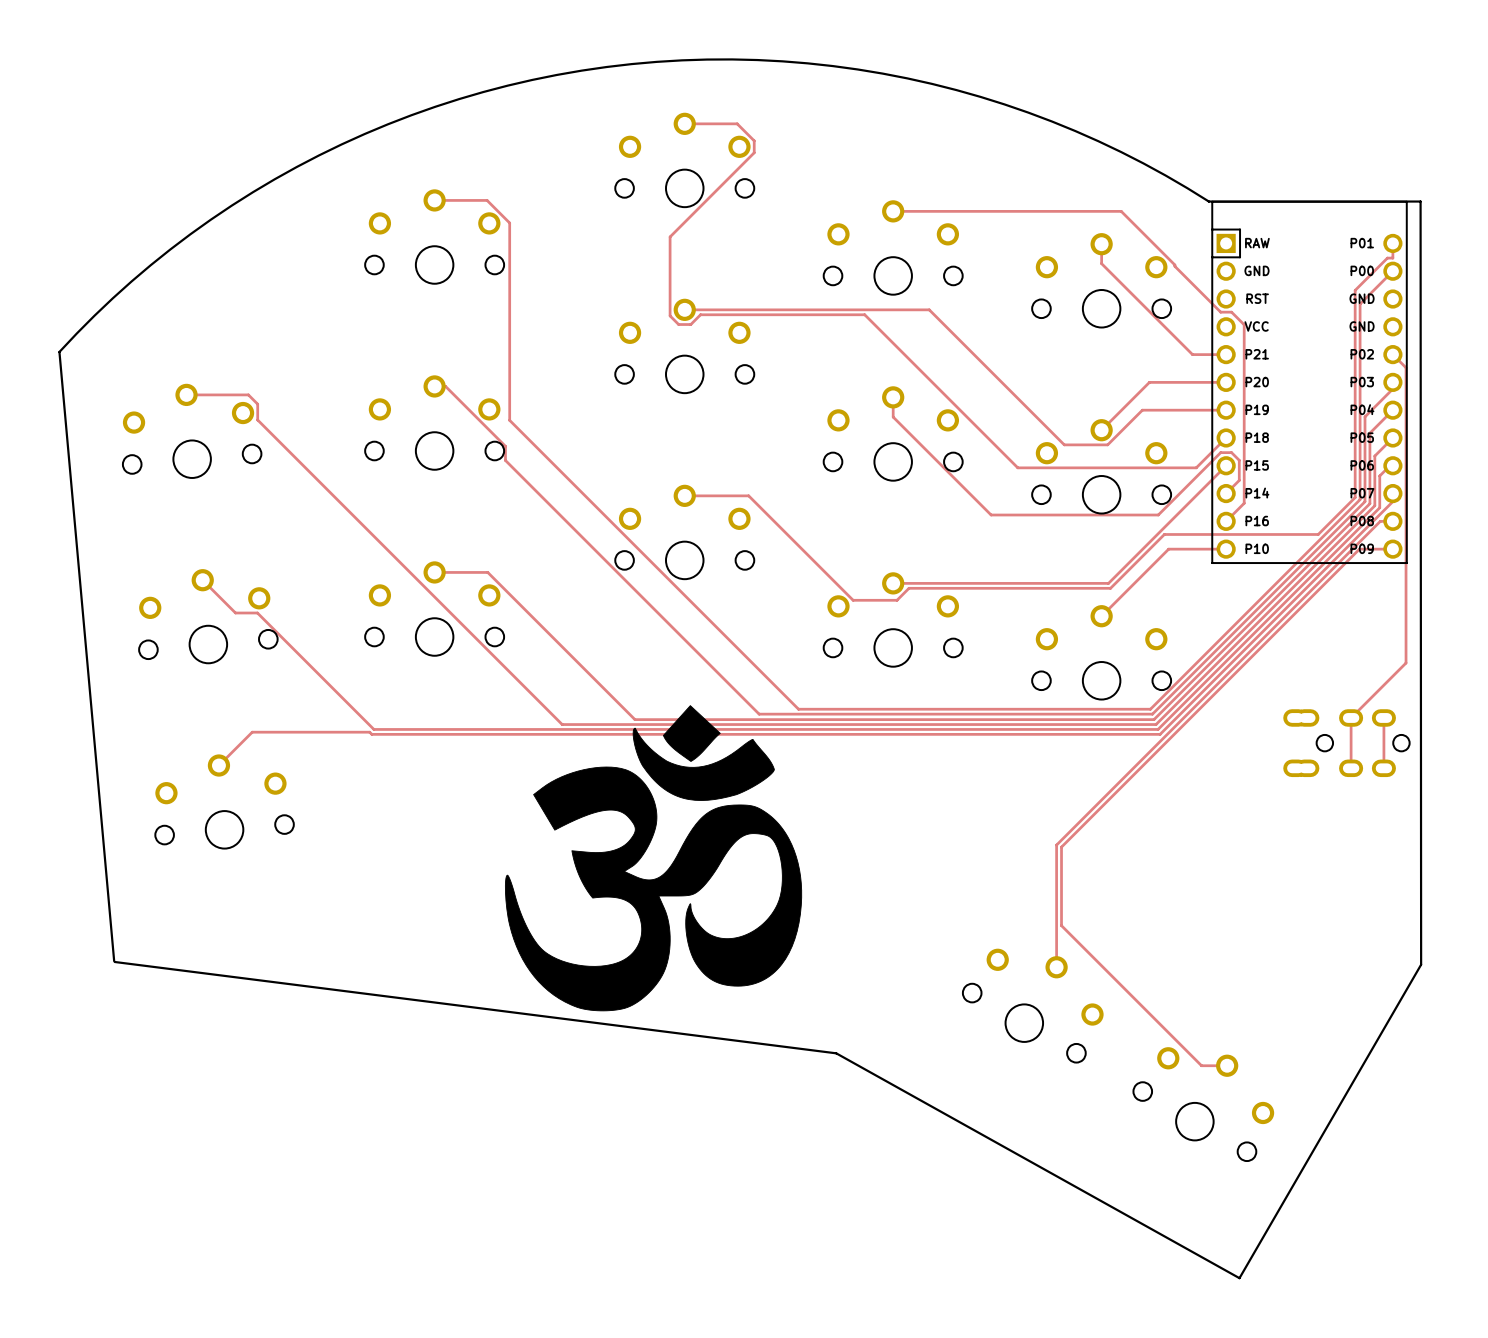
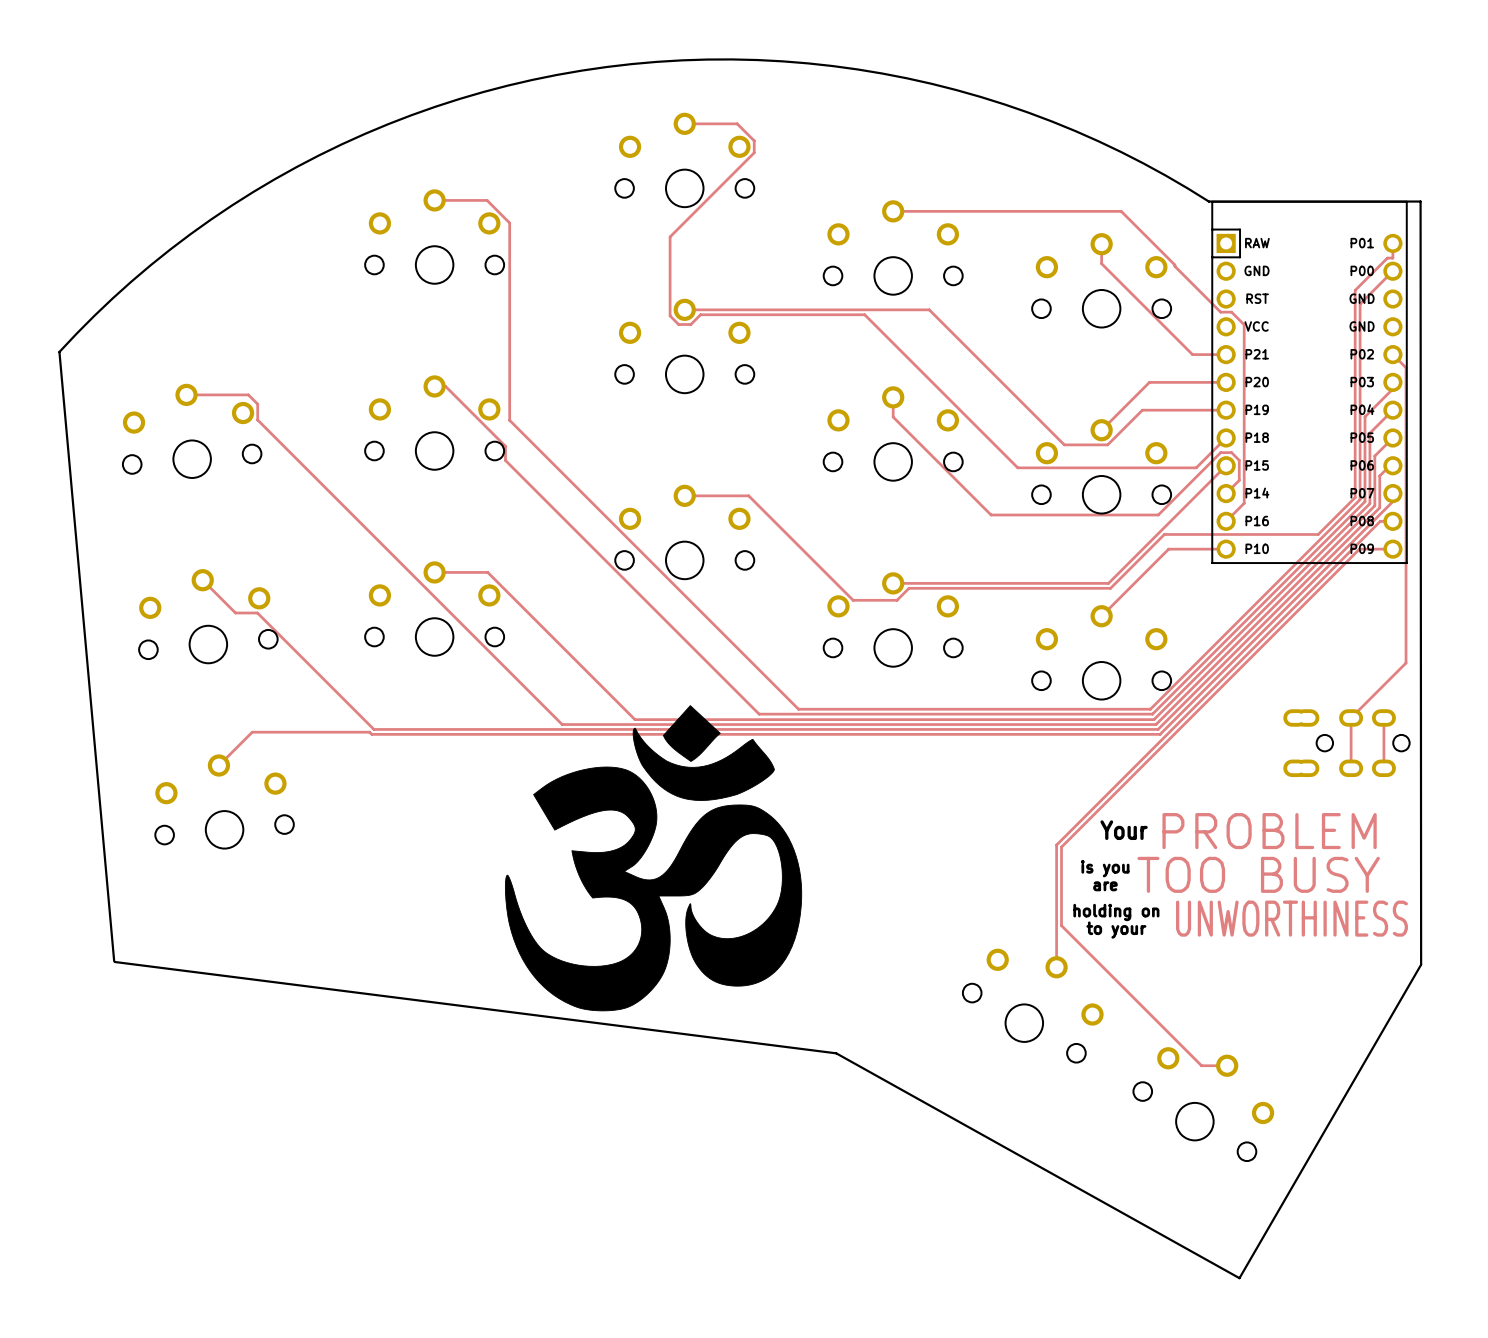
text: none -> Your (1124, 830)
text: none -> PROBLEM (1269, 831)
text: none -> is you (1105, 868)
text: none -> TOO BUSY (1258, 874)
text: none -> are (1105, 886)
text: none -> holding on (1116, 912)
text: none -> UNWORTHINESS (1291, 918)
text: none -> to your (1116, 930)

